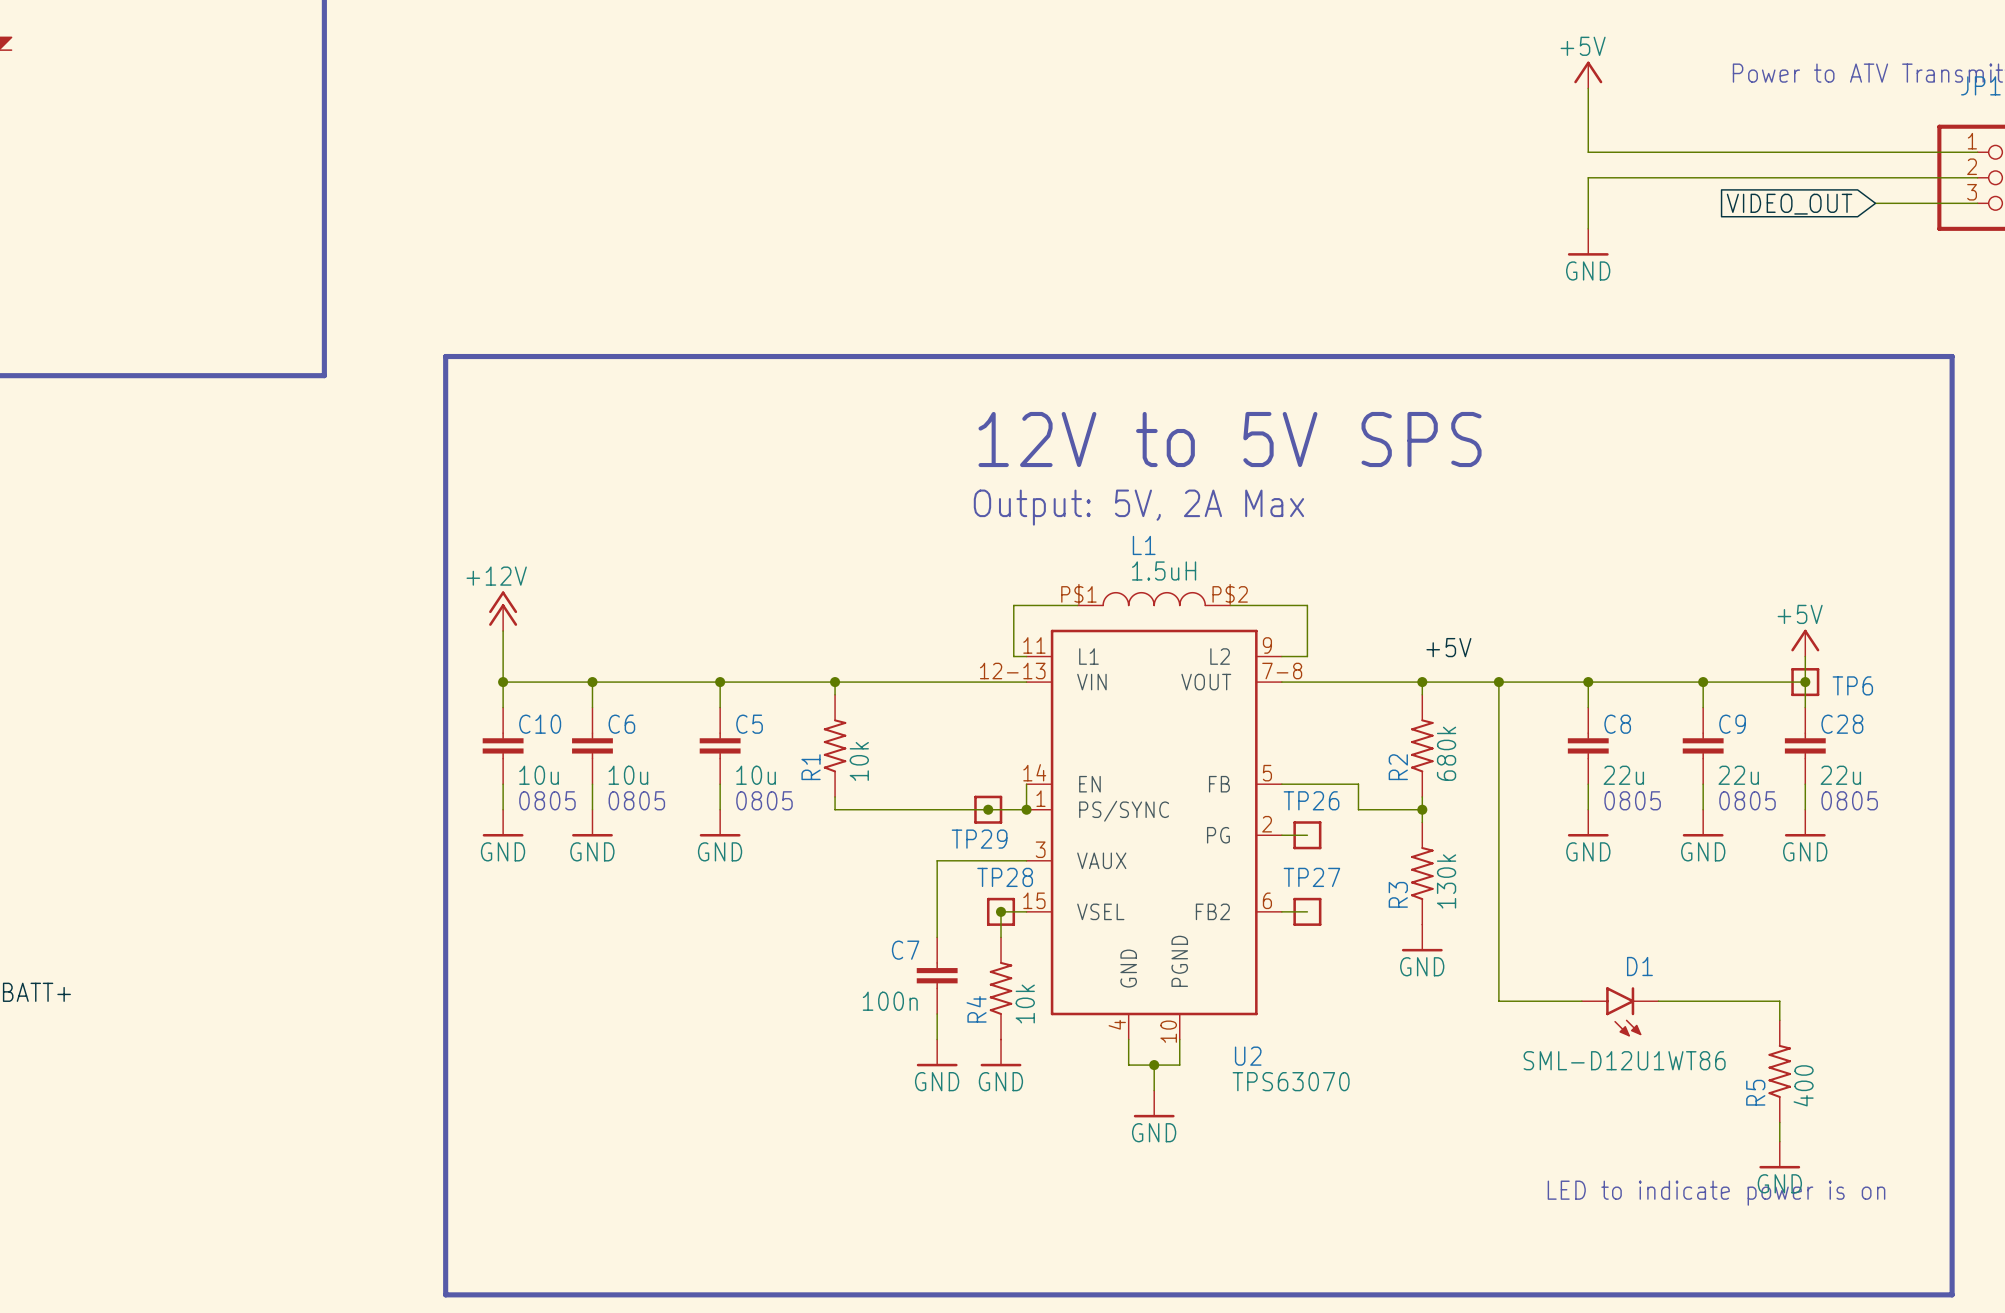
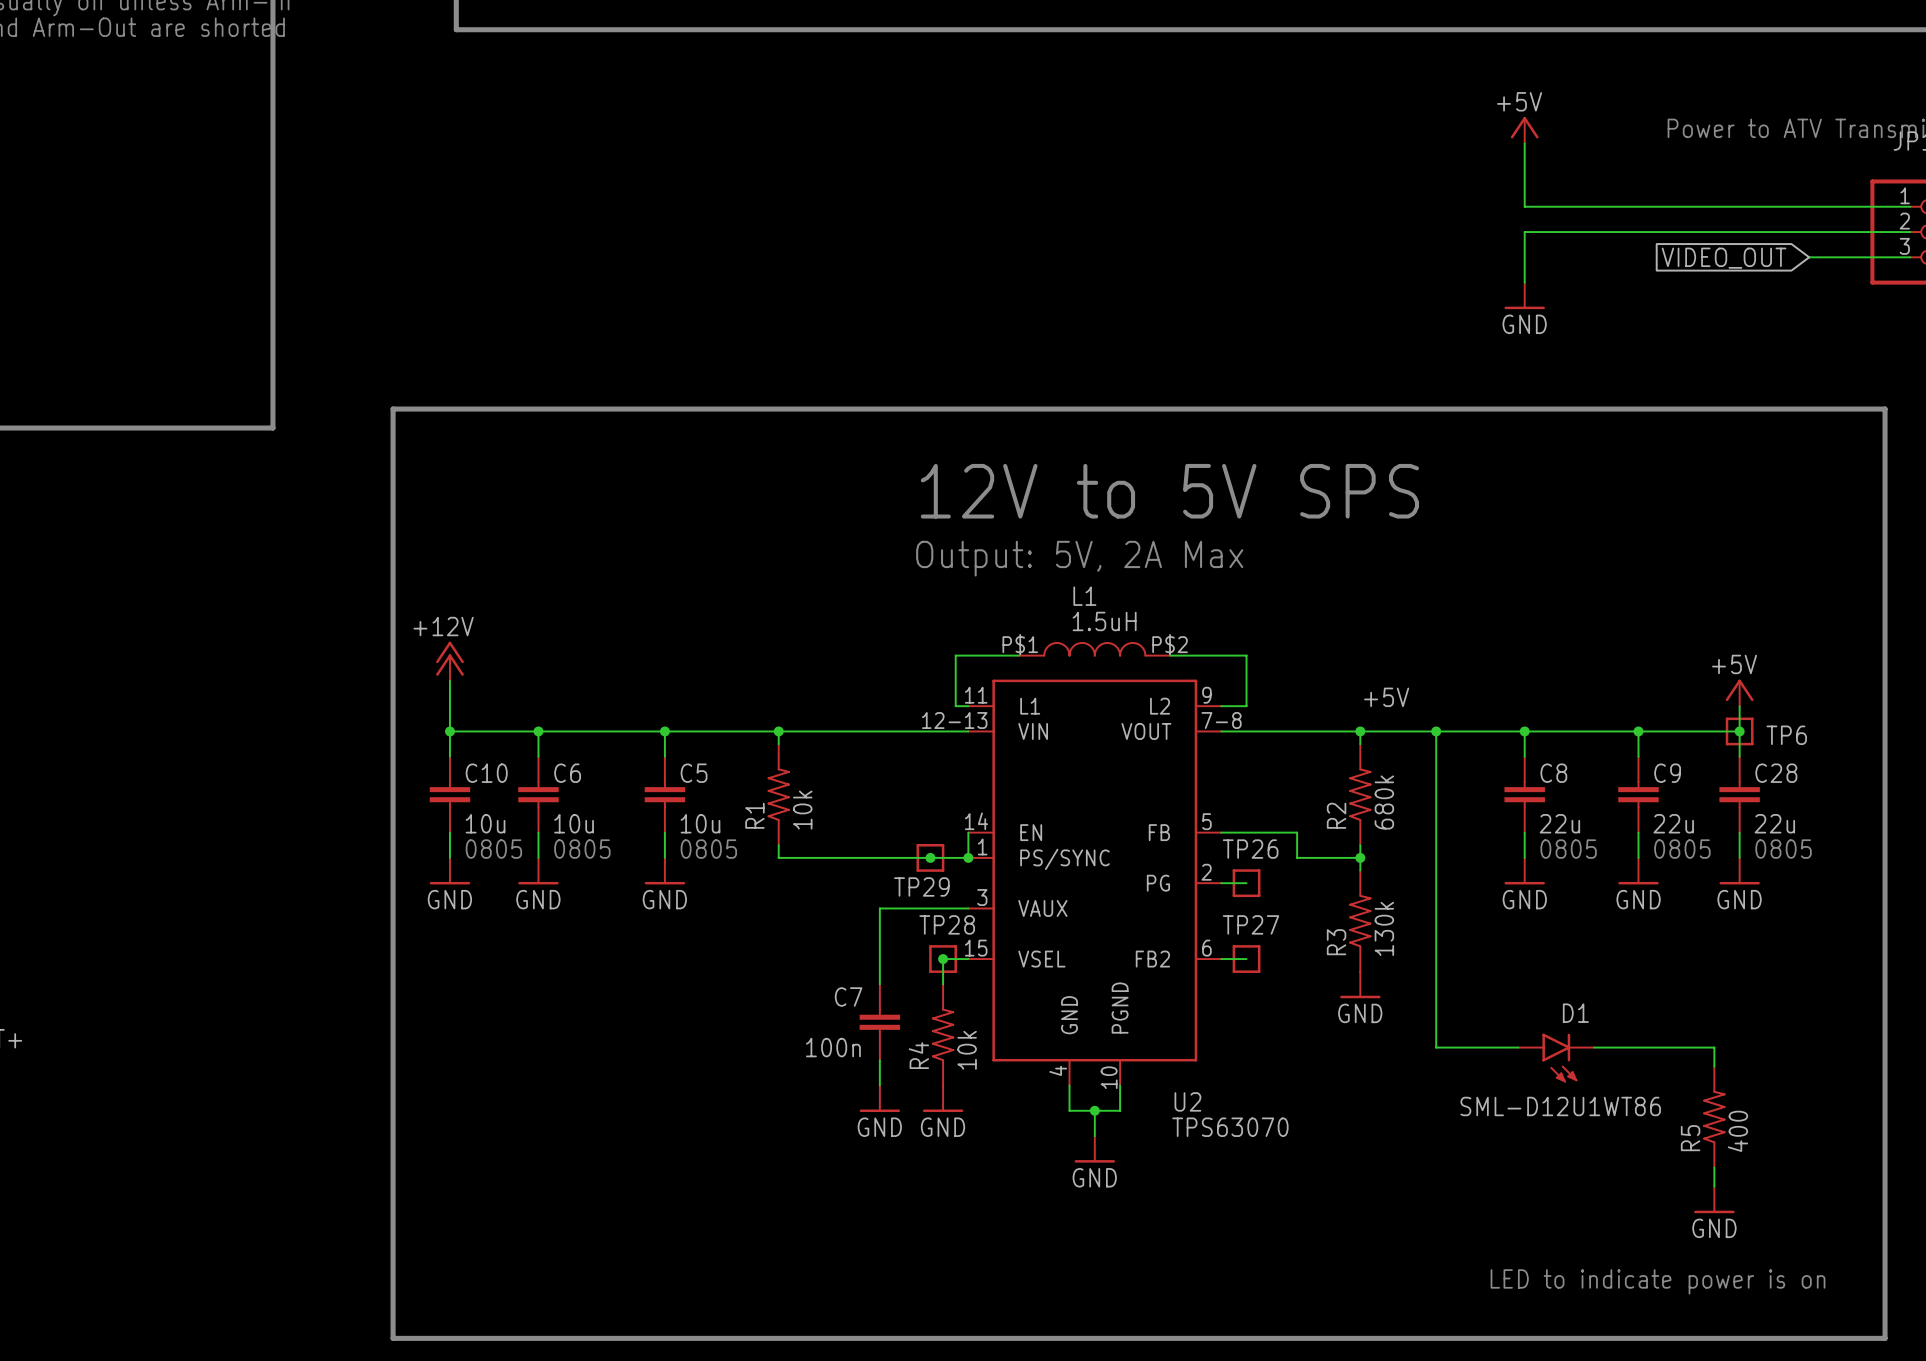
text position: LED to indicate power is on (1716, 1193) -> LED to indicate power is on (1658, 1281)

